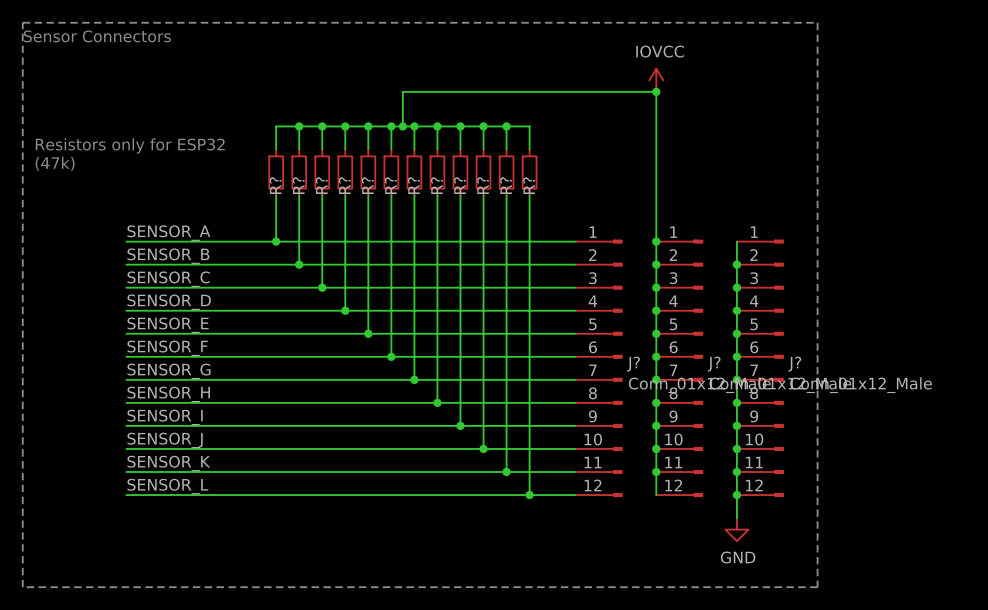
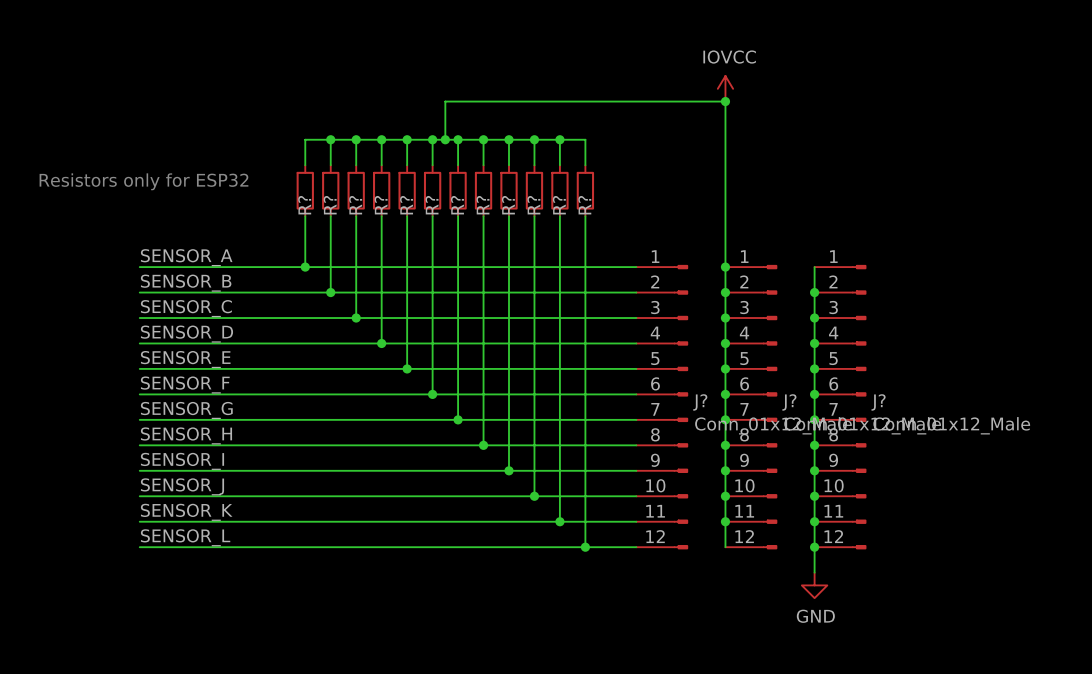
line: (22, 22) (817, 22) (817, 587) (22, 587) (22, 22) -> none
text: Sensor Connectors (97, 36) -> none
text: Resistors only for ESP32 (130, 145) -> none
text: (47k) (55, 163) -> Resistors only for ESP32 (143, 181)

